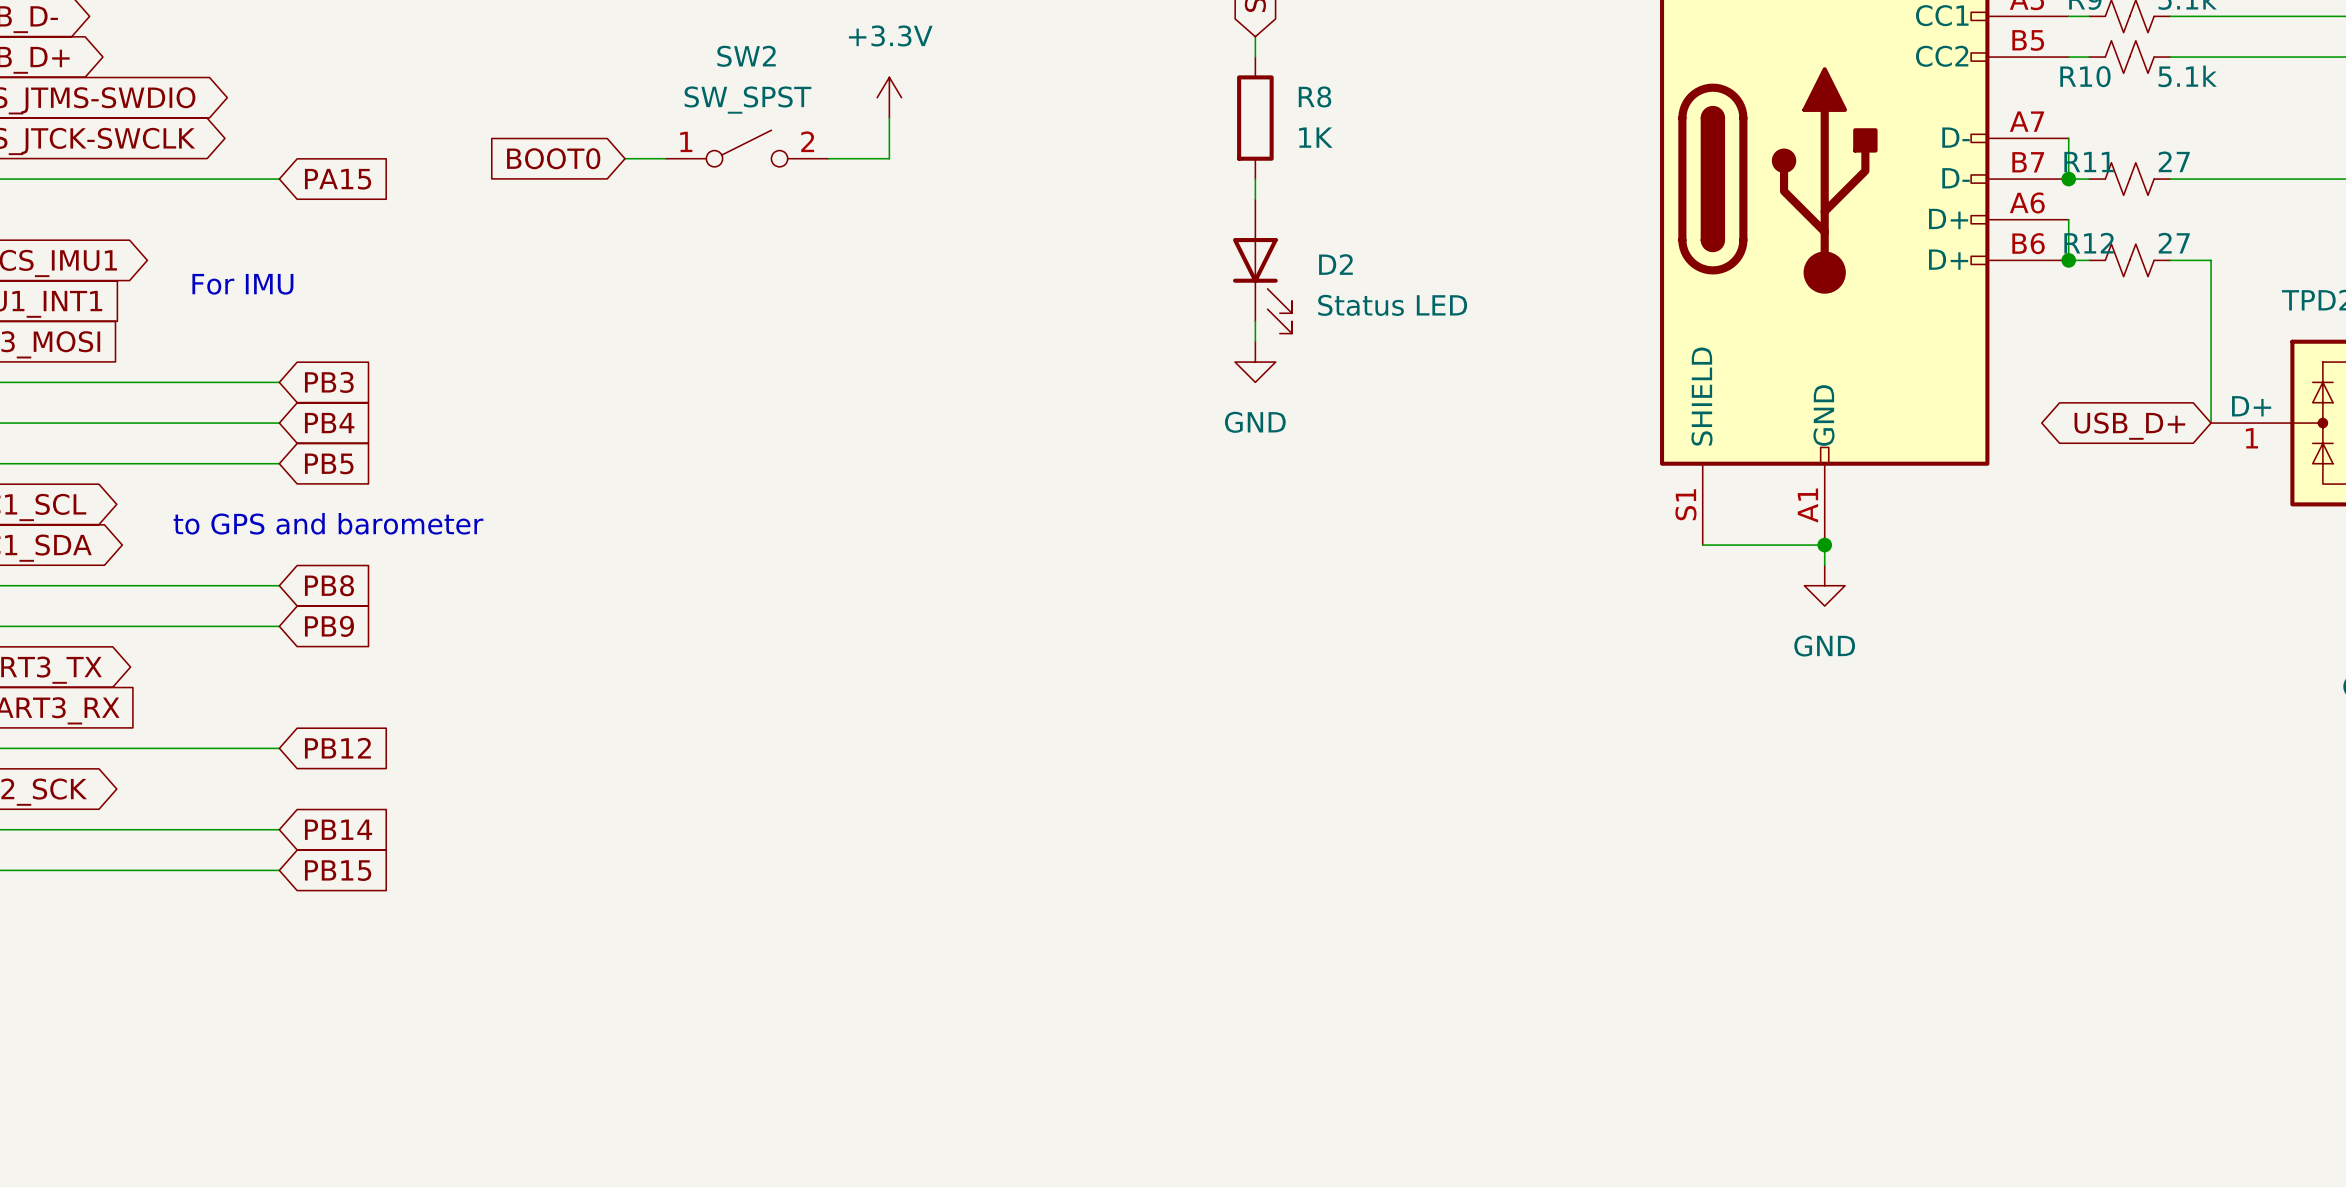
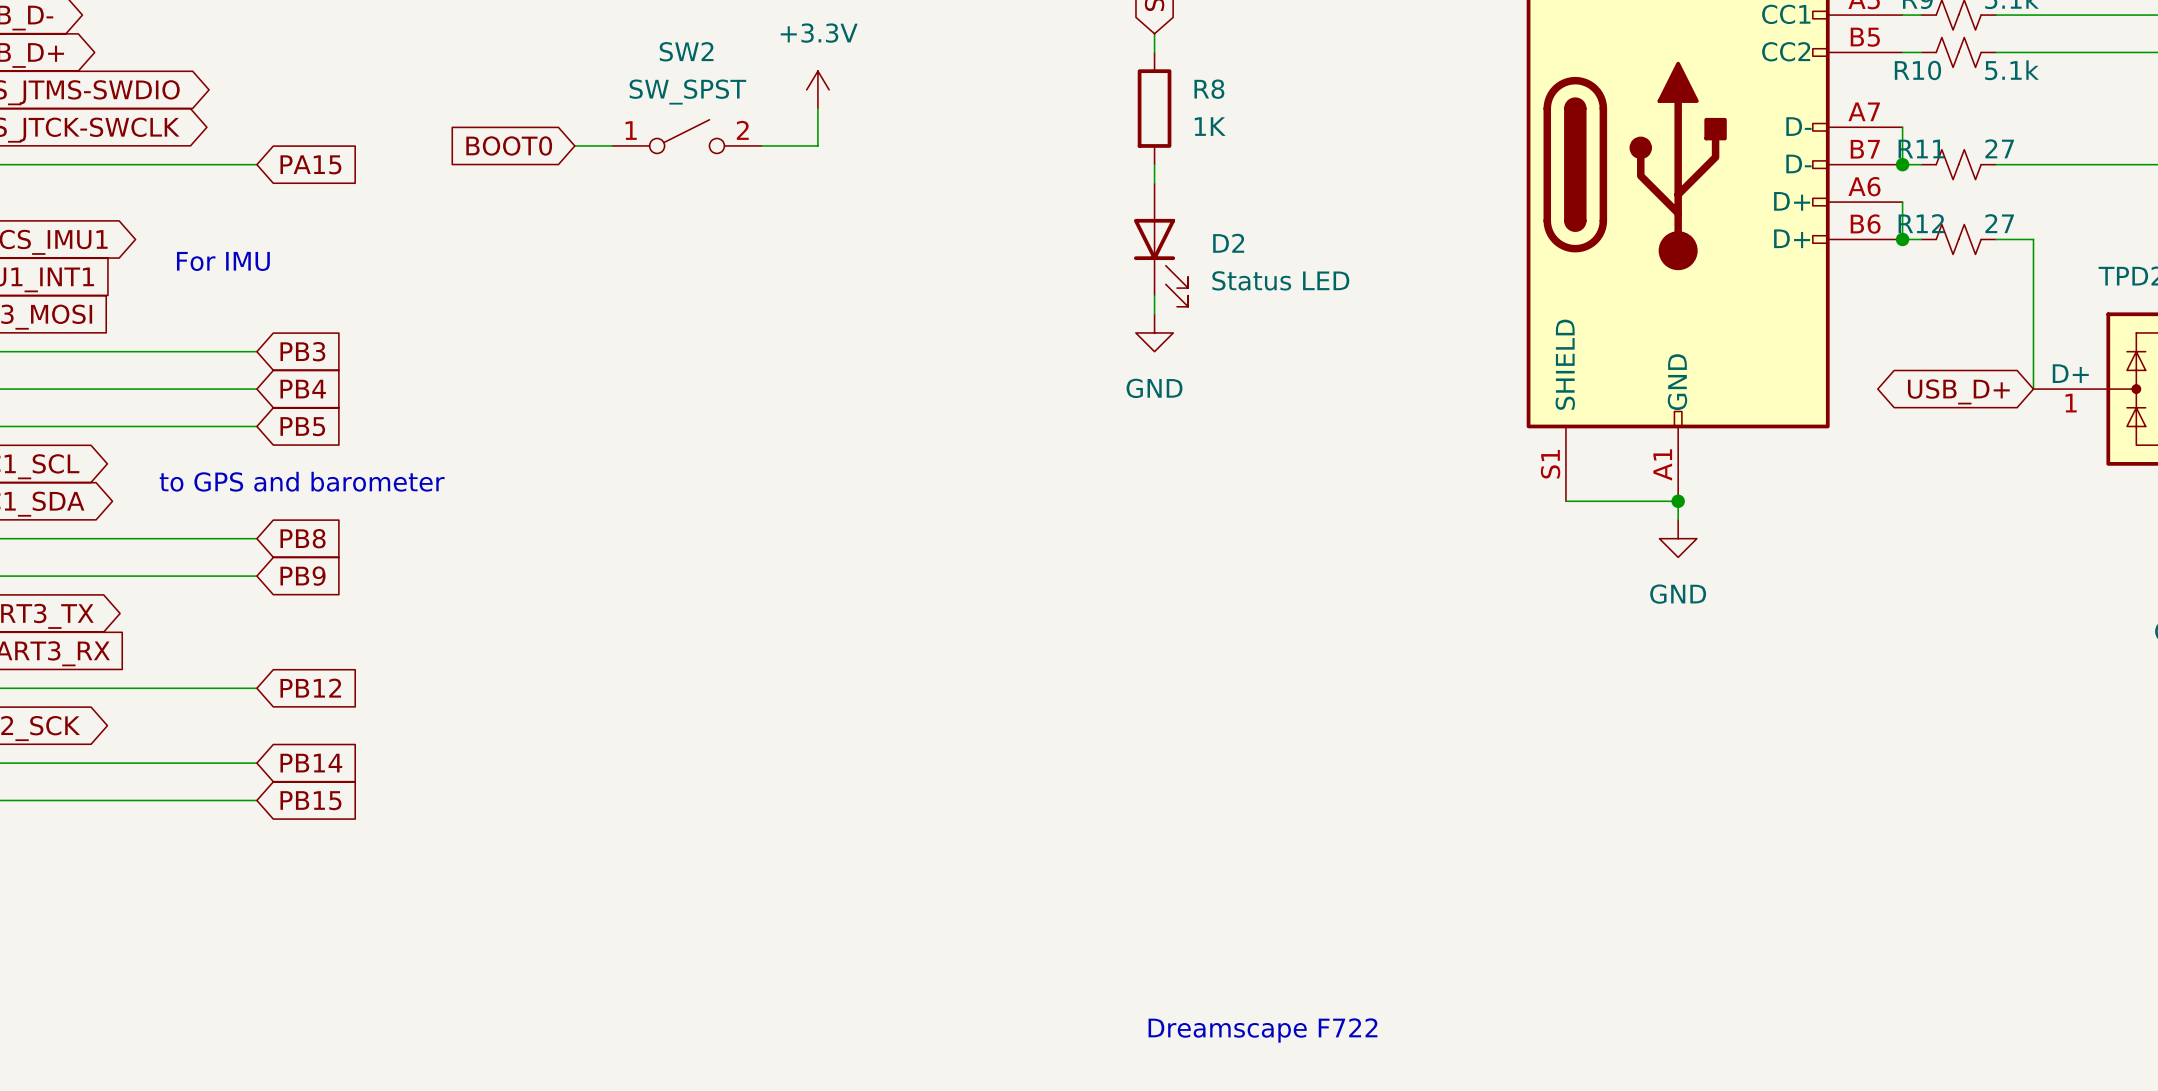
text: none -> Dreamscape F722 (1262, 1030)

